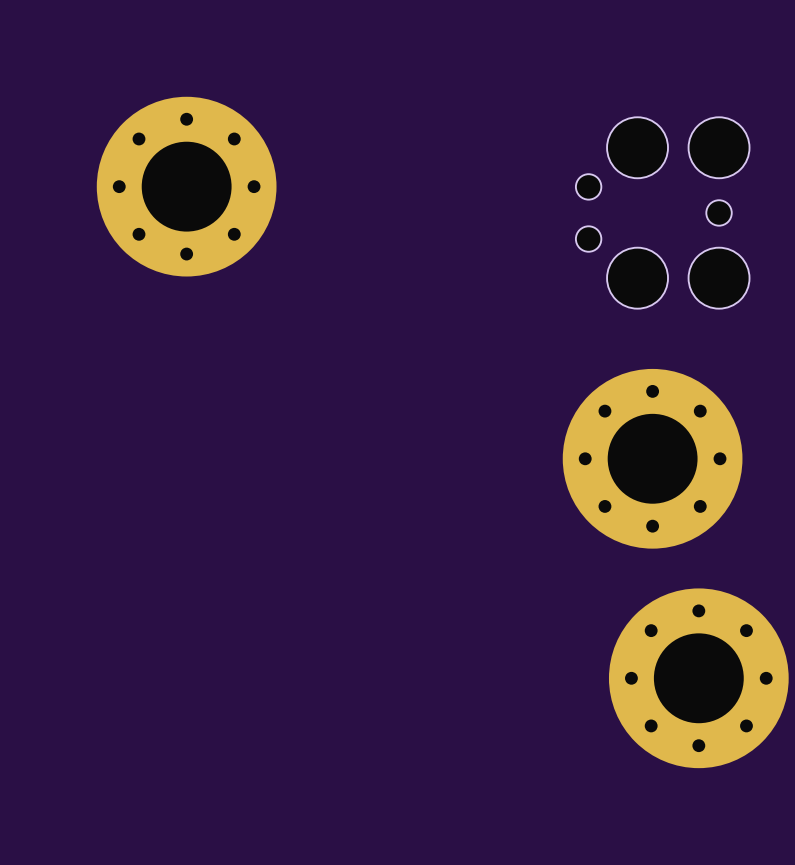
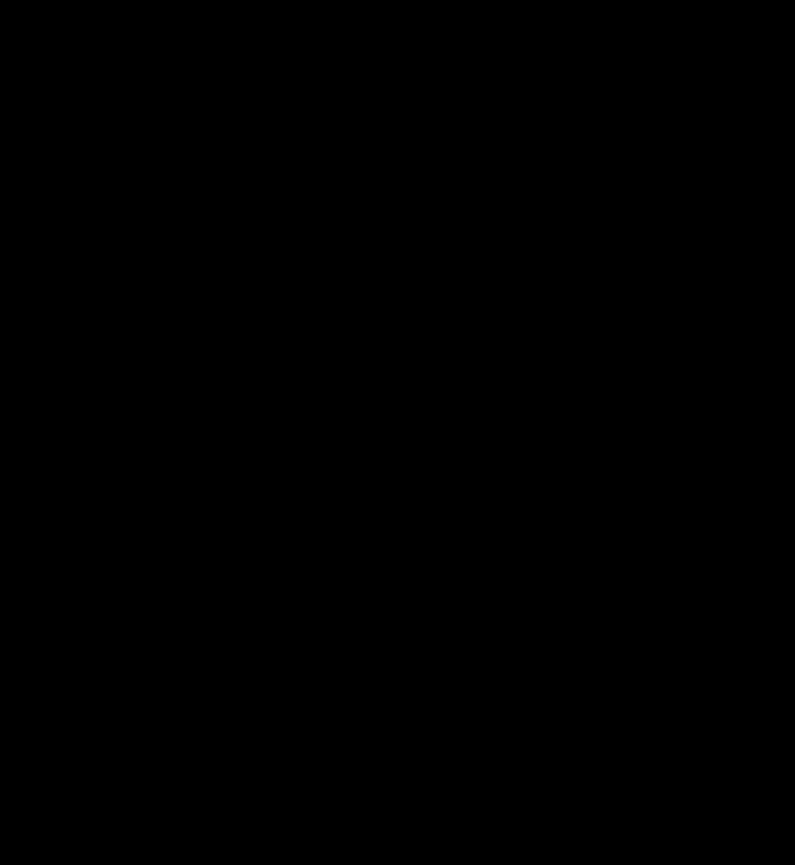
part: (186, 186) -> none
part: (662, 212) -> none
part: (652, 458) -> none
part: (698, 678) -> none

